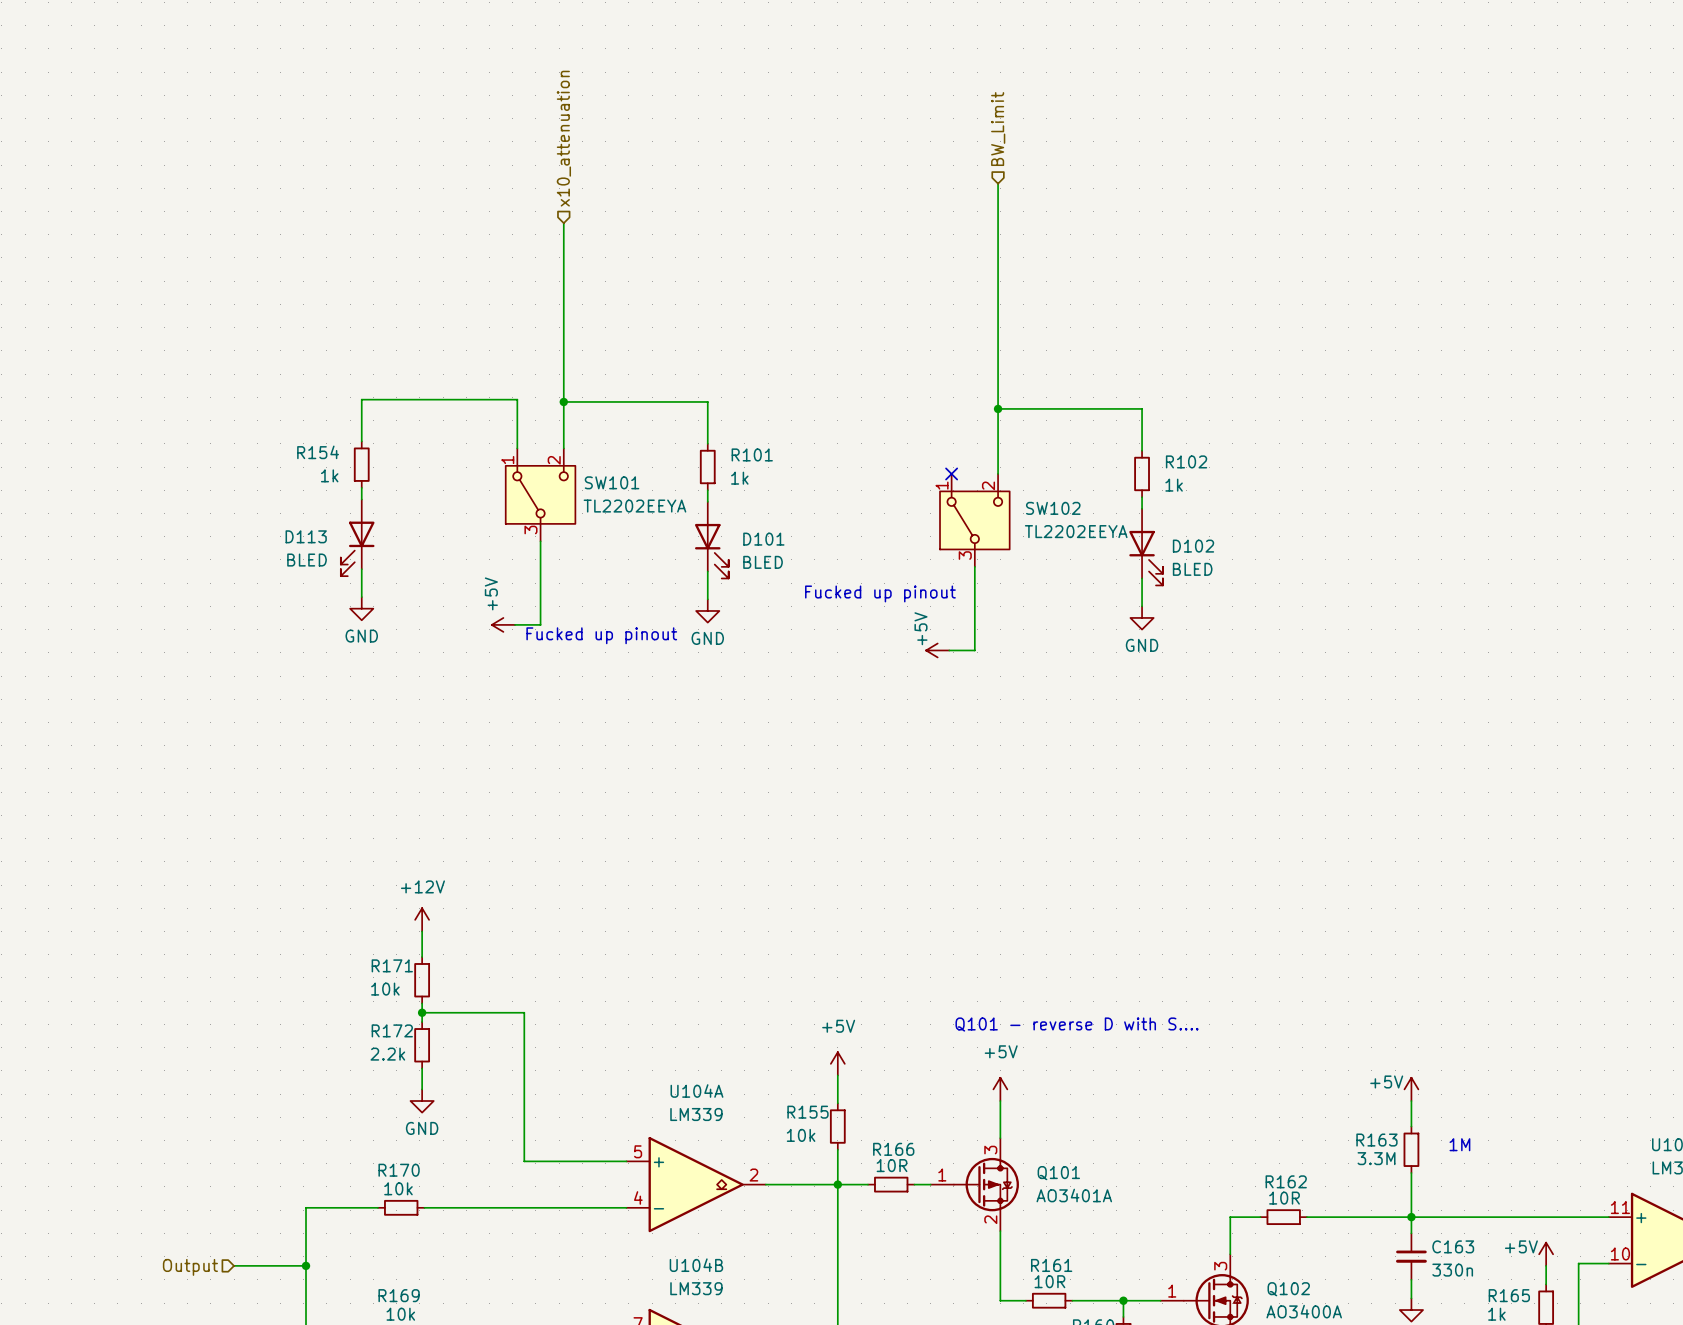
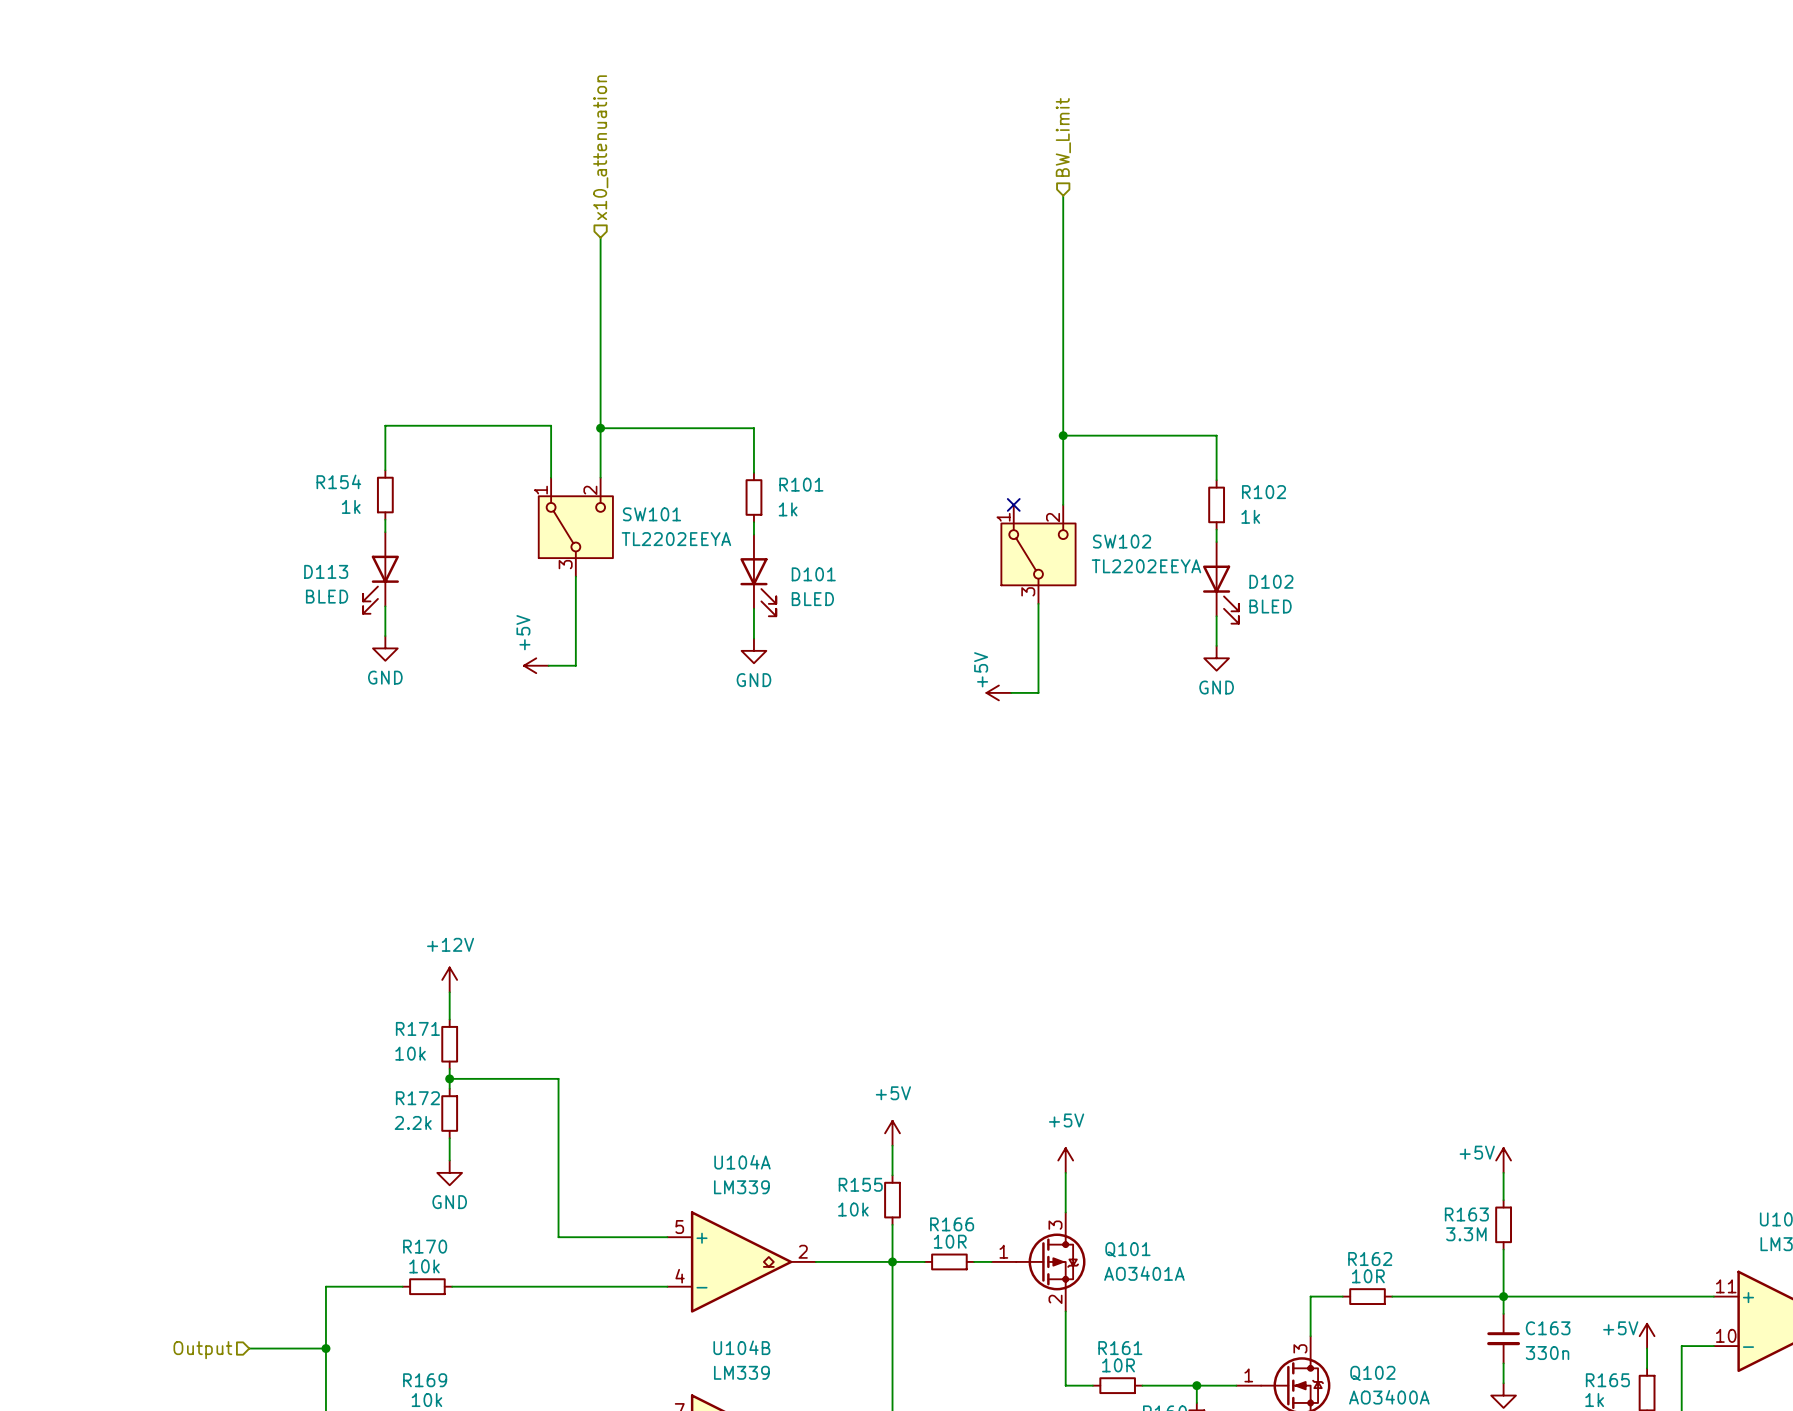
text: Fucked up pinout (880, 593) -> none
text: Fucked up pinout (601, 635) -> none
text: Q101 - reverse D with S.... (1077, 1024) -> none
text: 1M (1459, 1144) -> none

